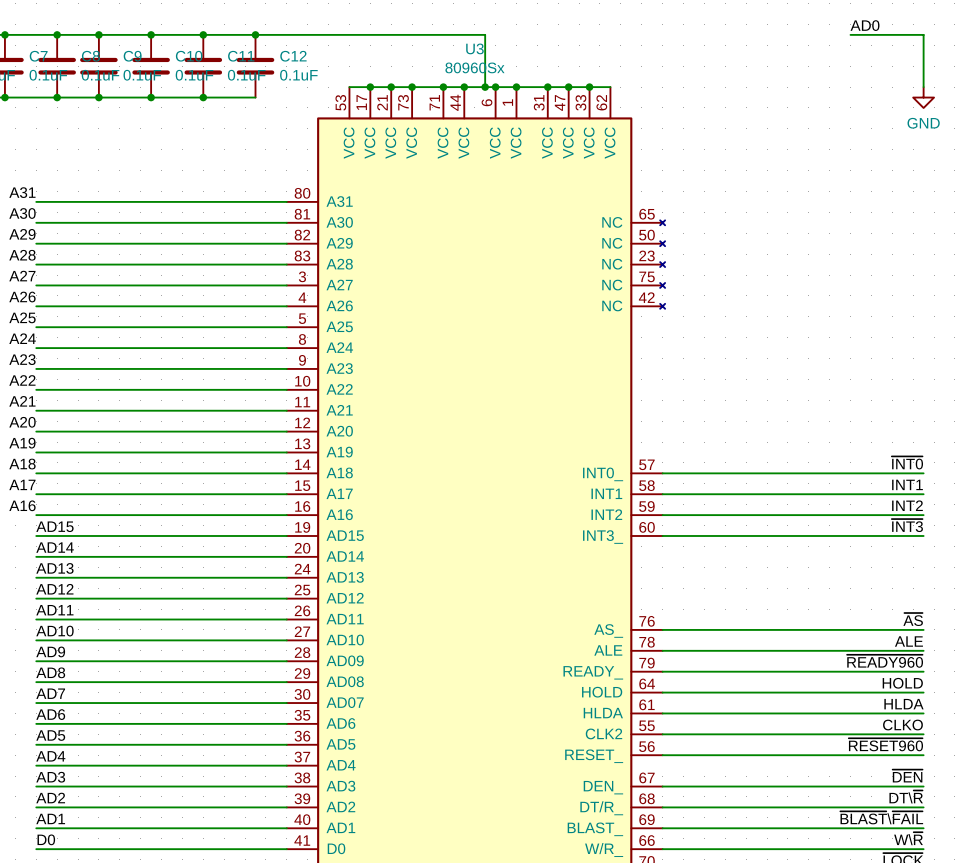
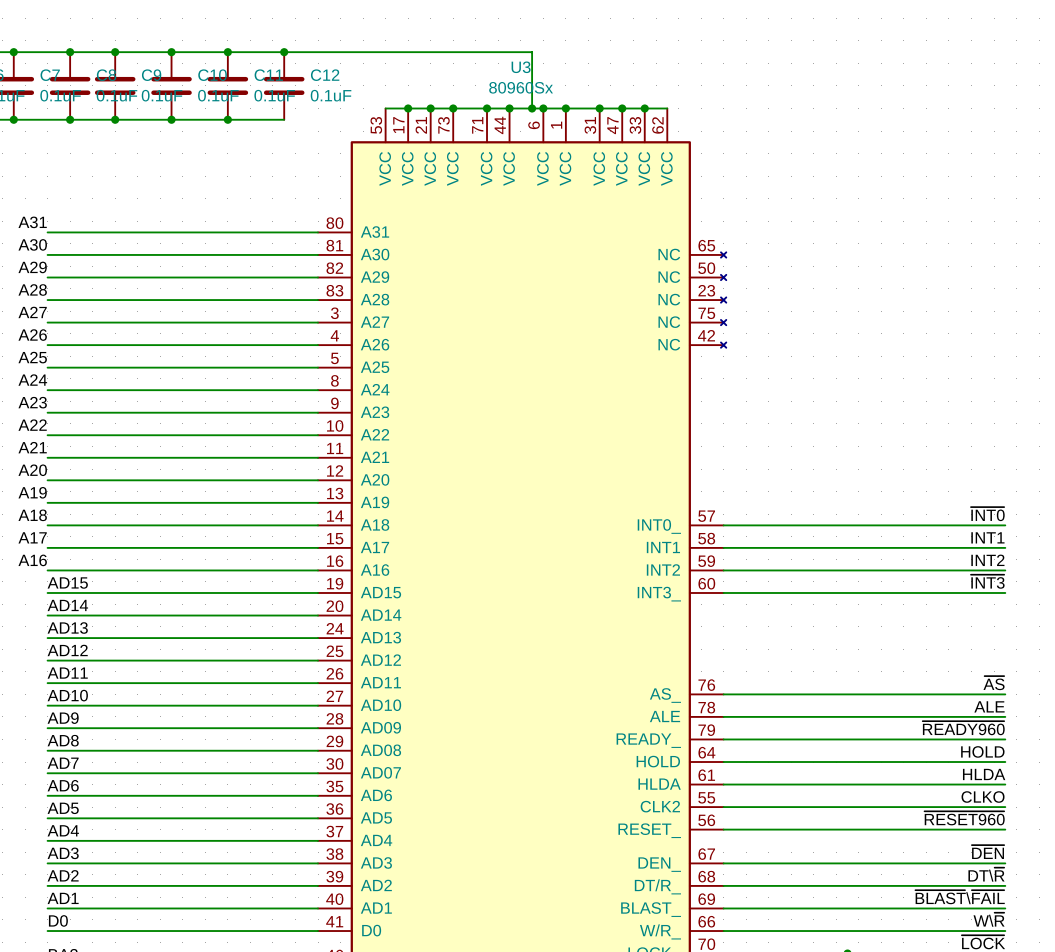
label: AD0 (865, 25) -> none
wire: (850, 34) (923, 34) (923, 87) -> none
power symbol: GND (923, 97) -> none

